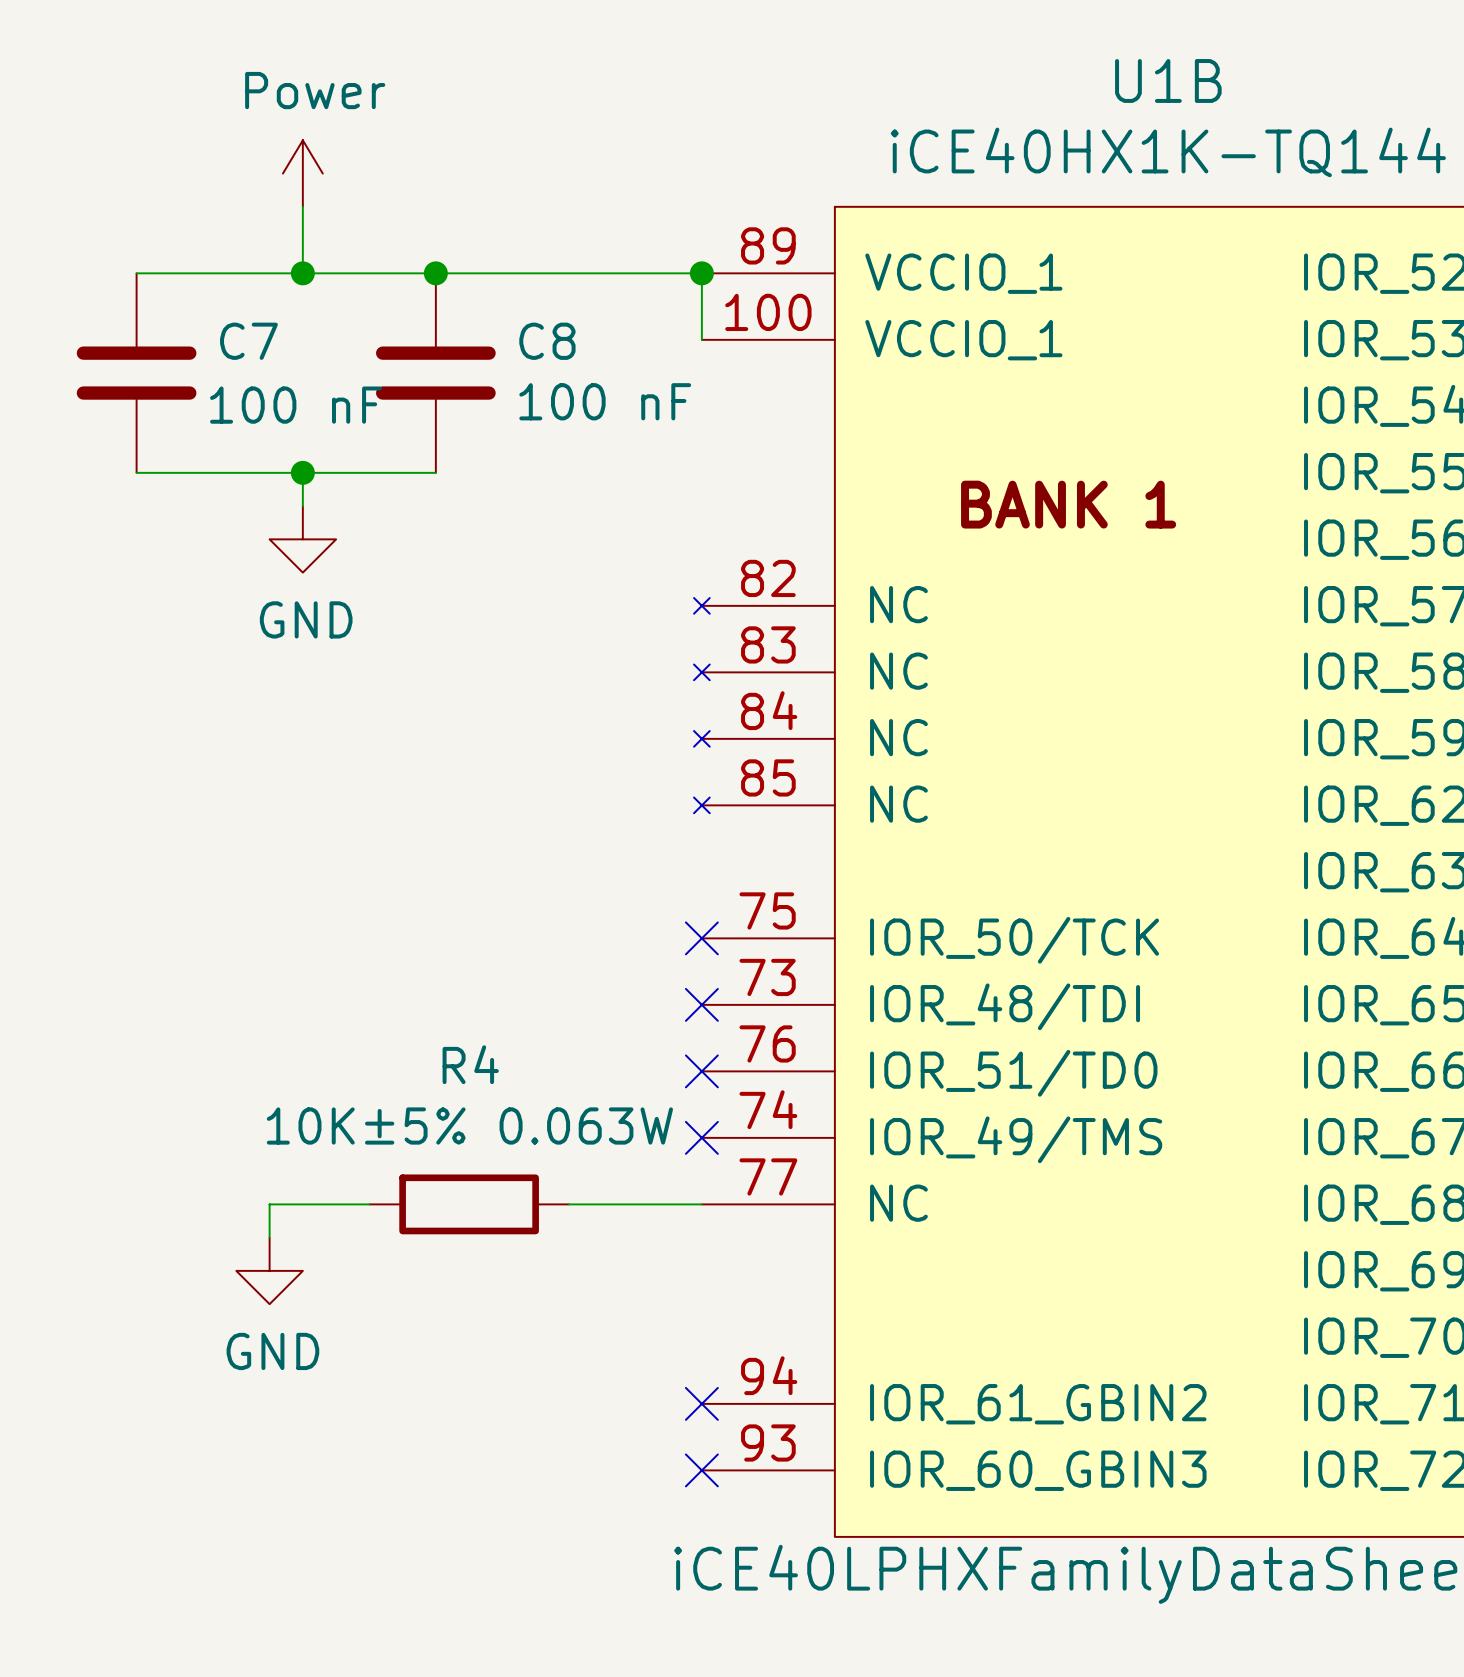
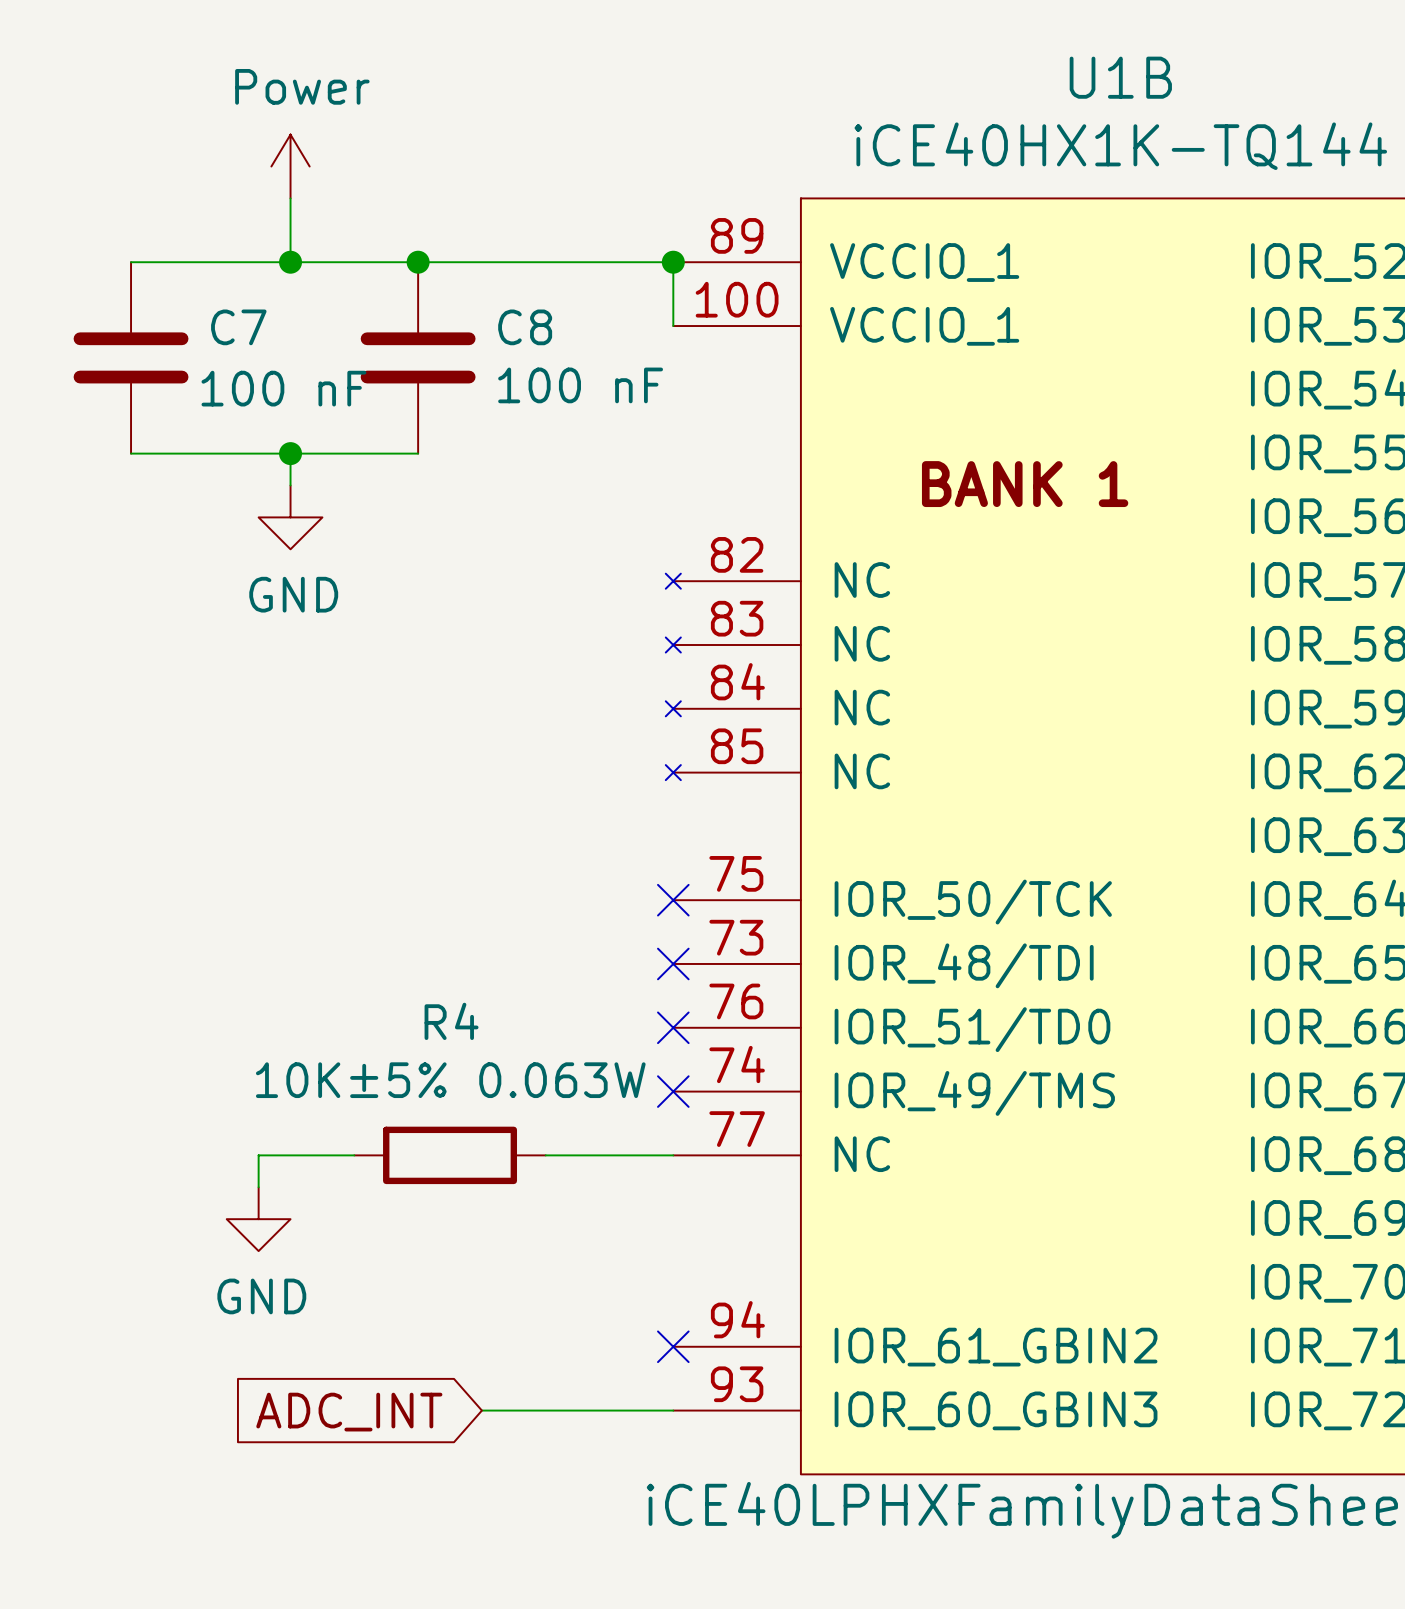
wire: none -> (481, 1410) (673, 1410)
no-connect mark: (701, 1470) -> none
global label: none -> ADC_INT (349, 1412)

